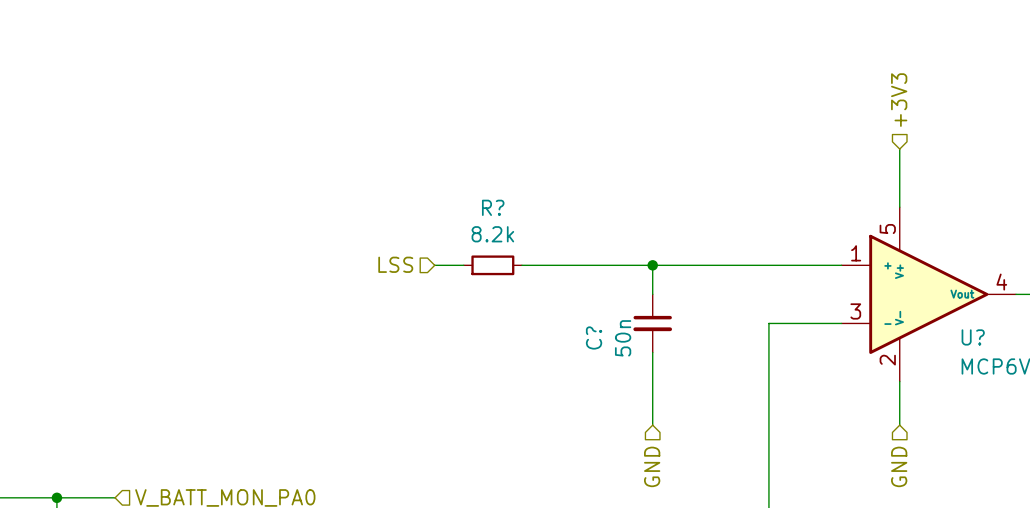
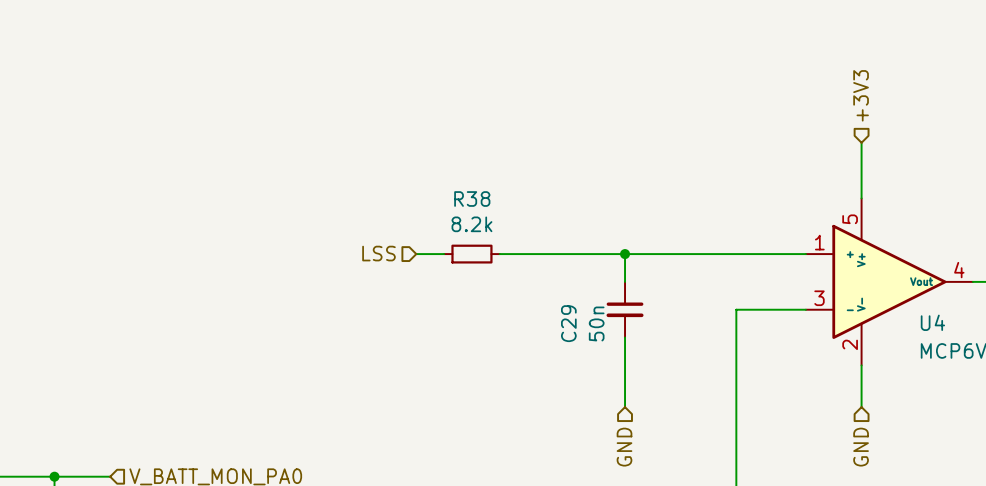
R? name: R? (493, 207) -> R38 (472, 199)
C? name: C? (594, 337) -> C29 (568, 323)
U? name: U? (973, 337) -> U4 (932, 322)

